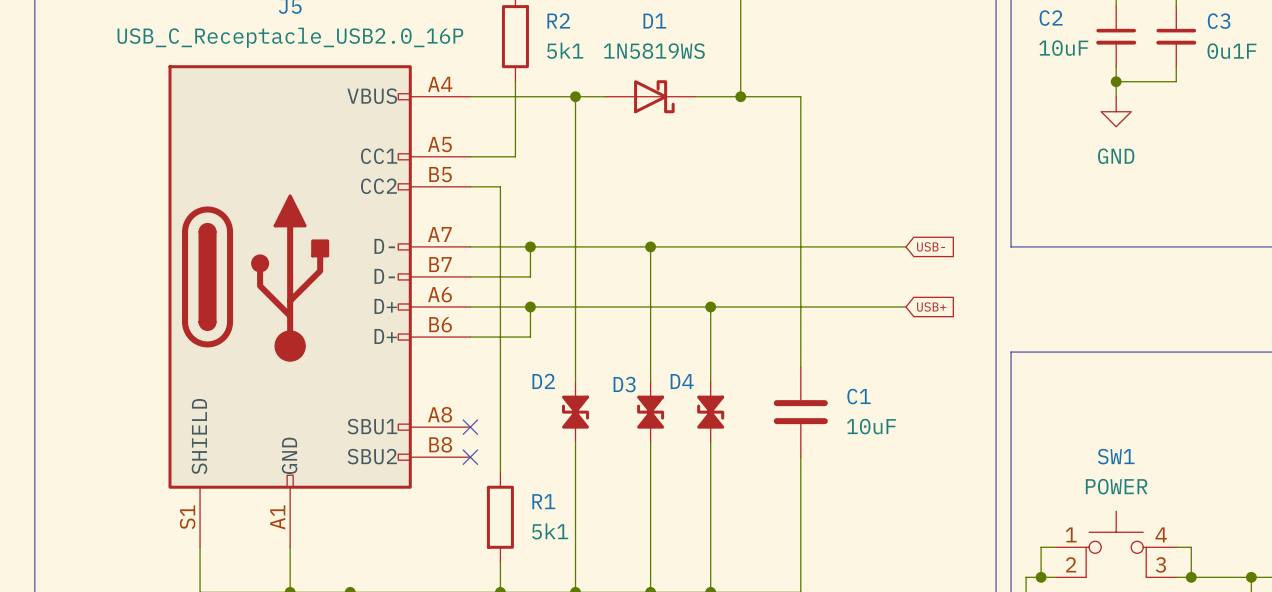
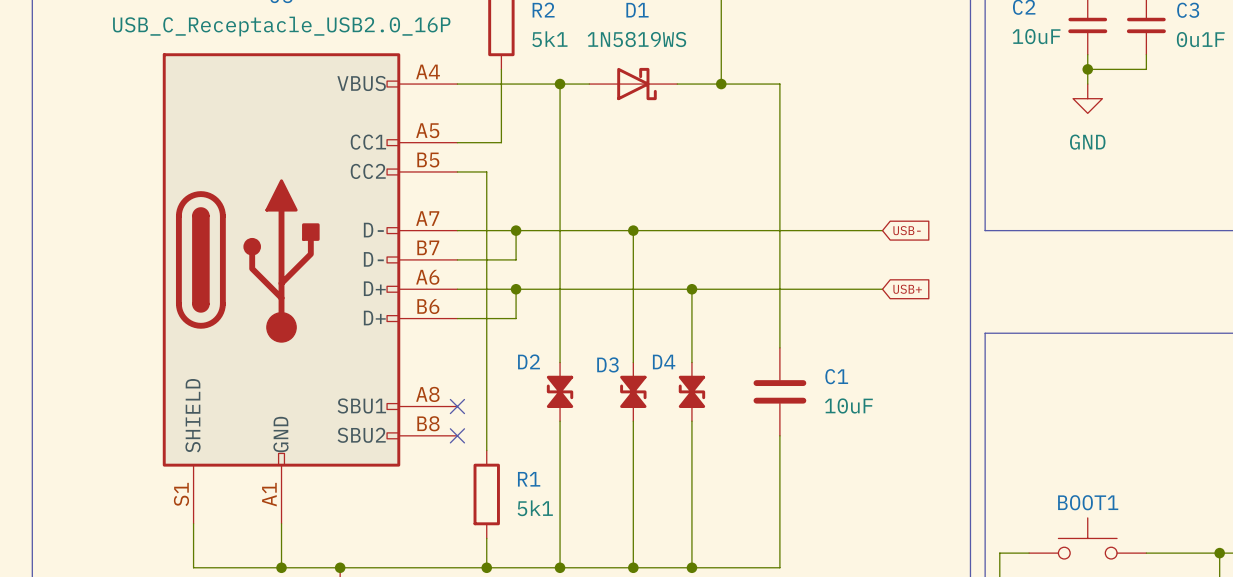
SW1: POWER (1116, 544) -> none
wire: (1056, 547) (1041, 547) (1041, 577) -> none
wire: (1176, 547) (1191, 547) (1191, 577) -> none
BOOT1: none -> (1087, 538)
junction: (1041, 577) -> none
junction: (1191, 577) -> none

